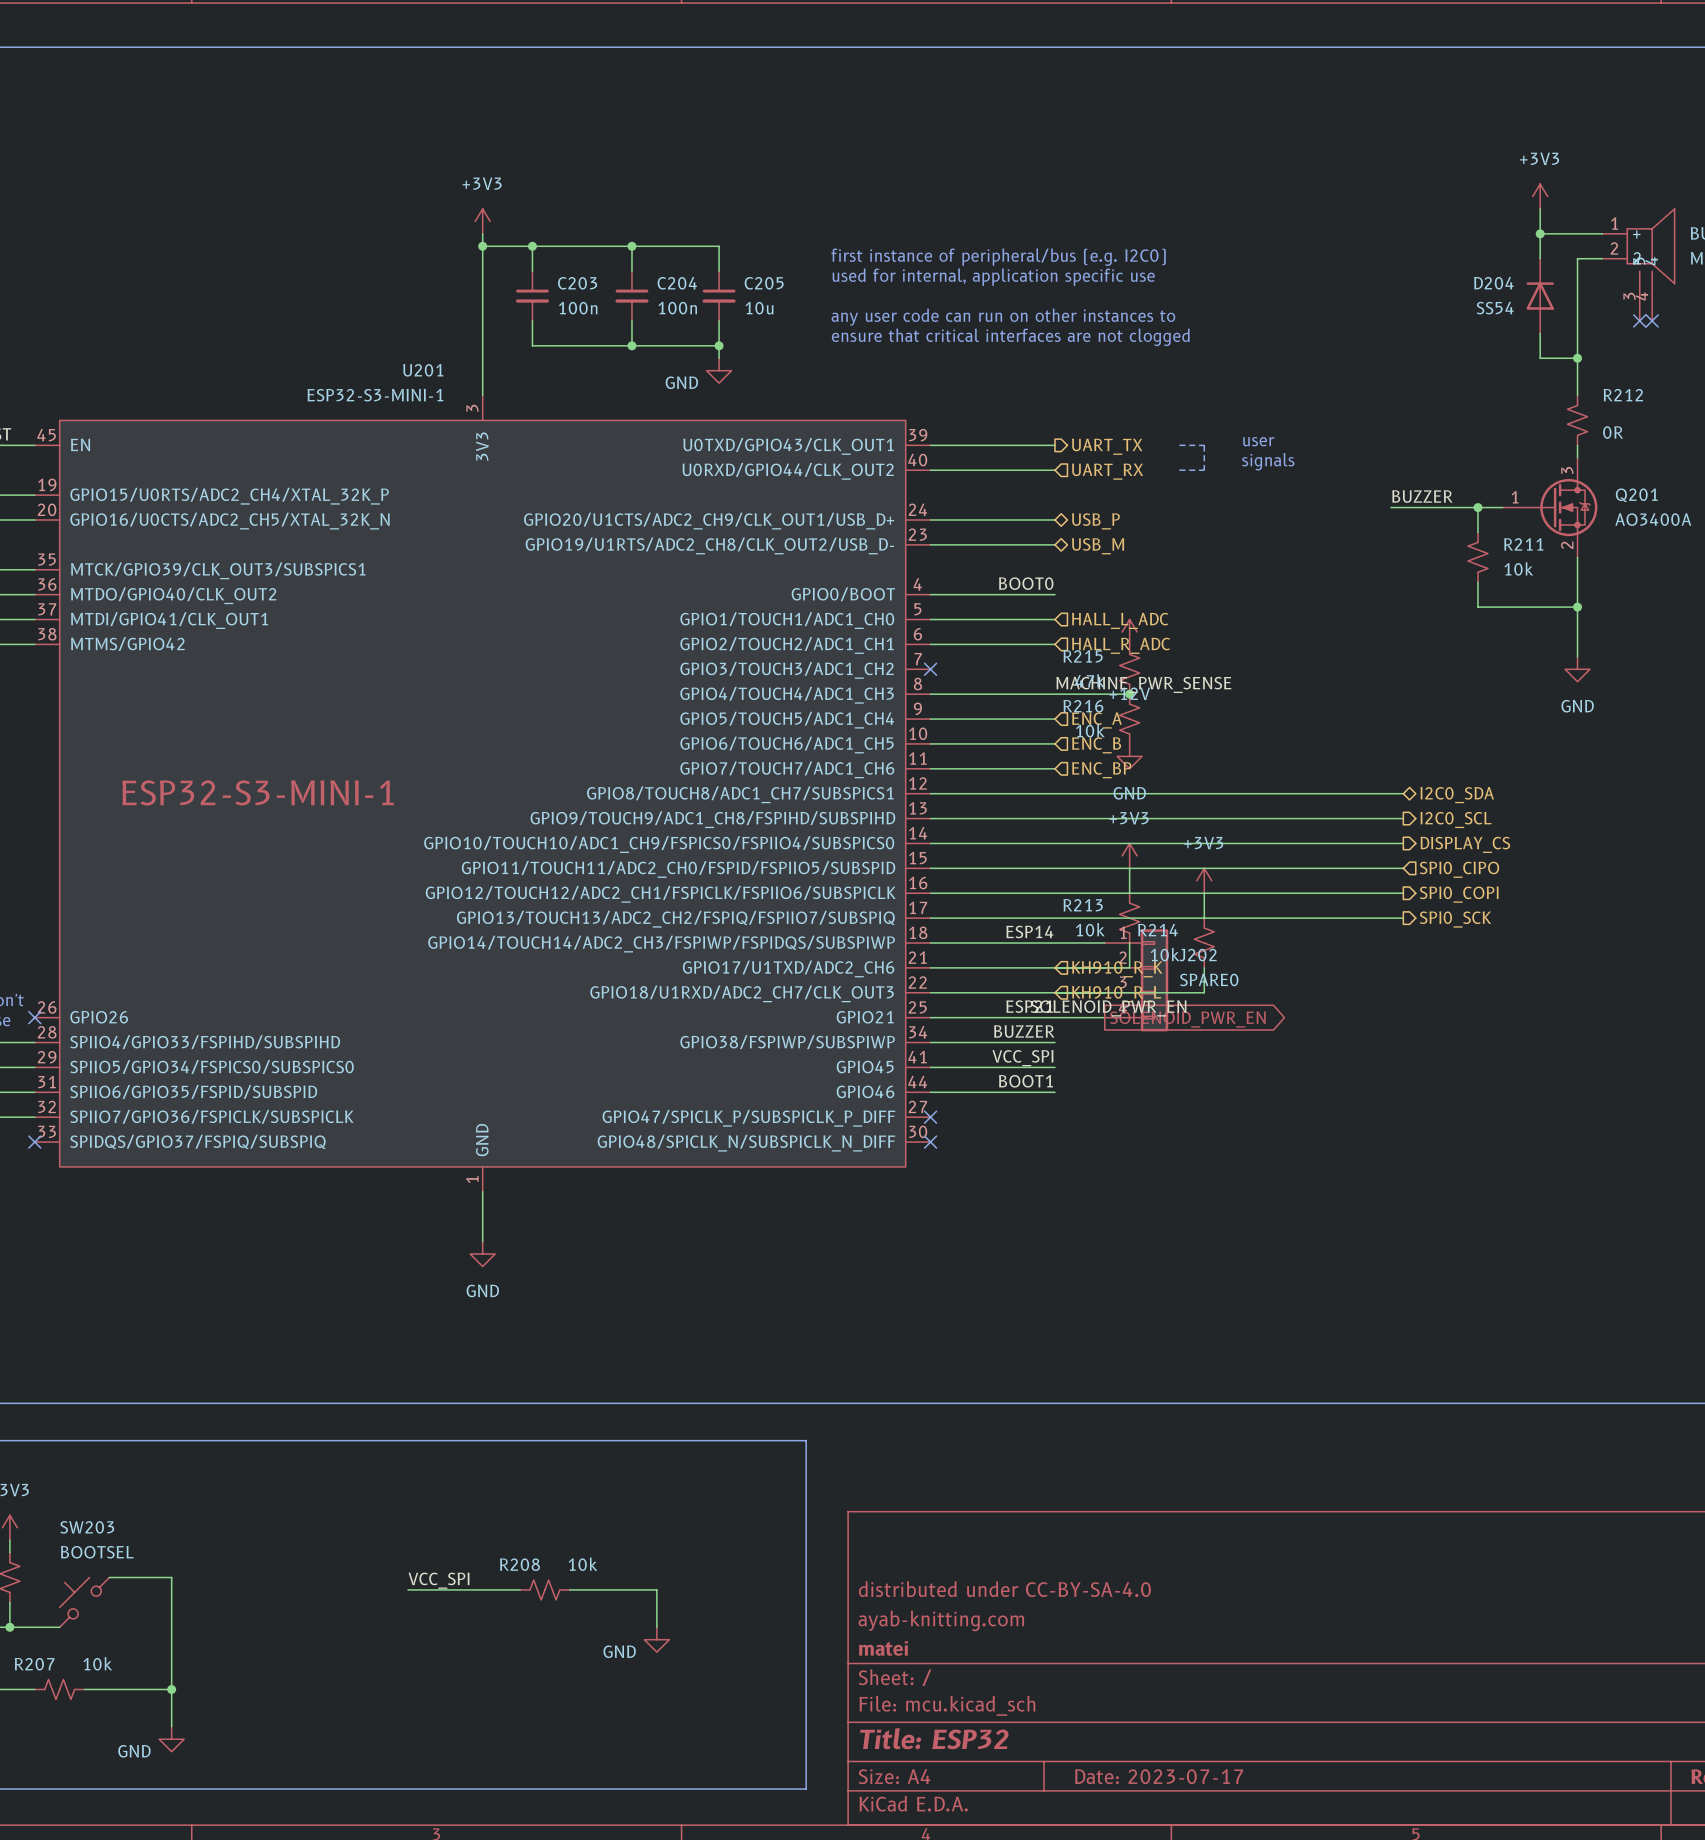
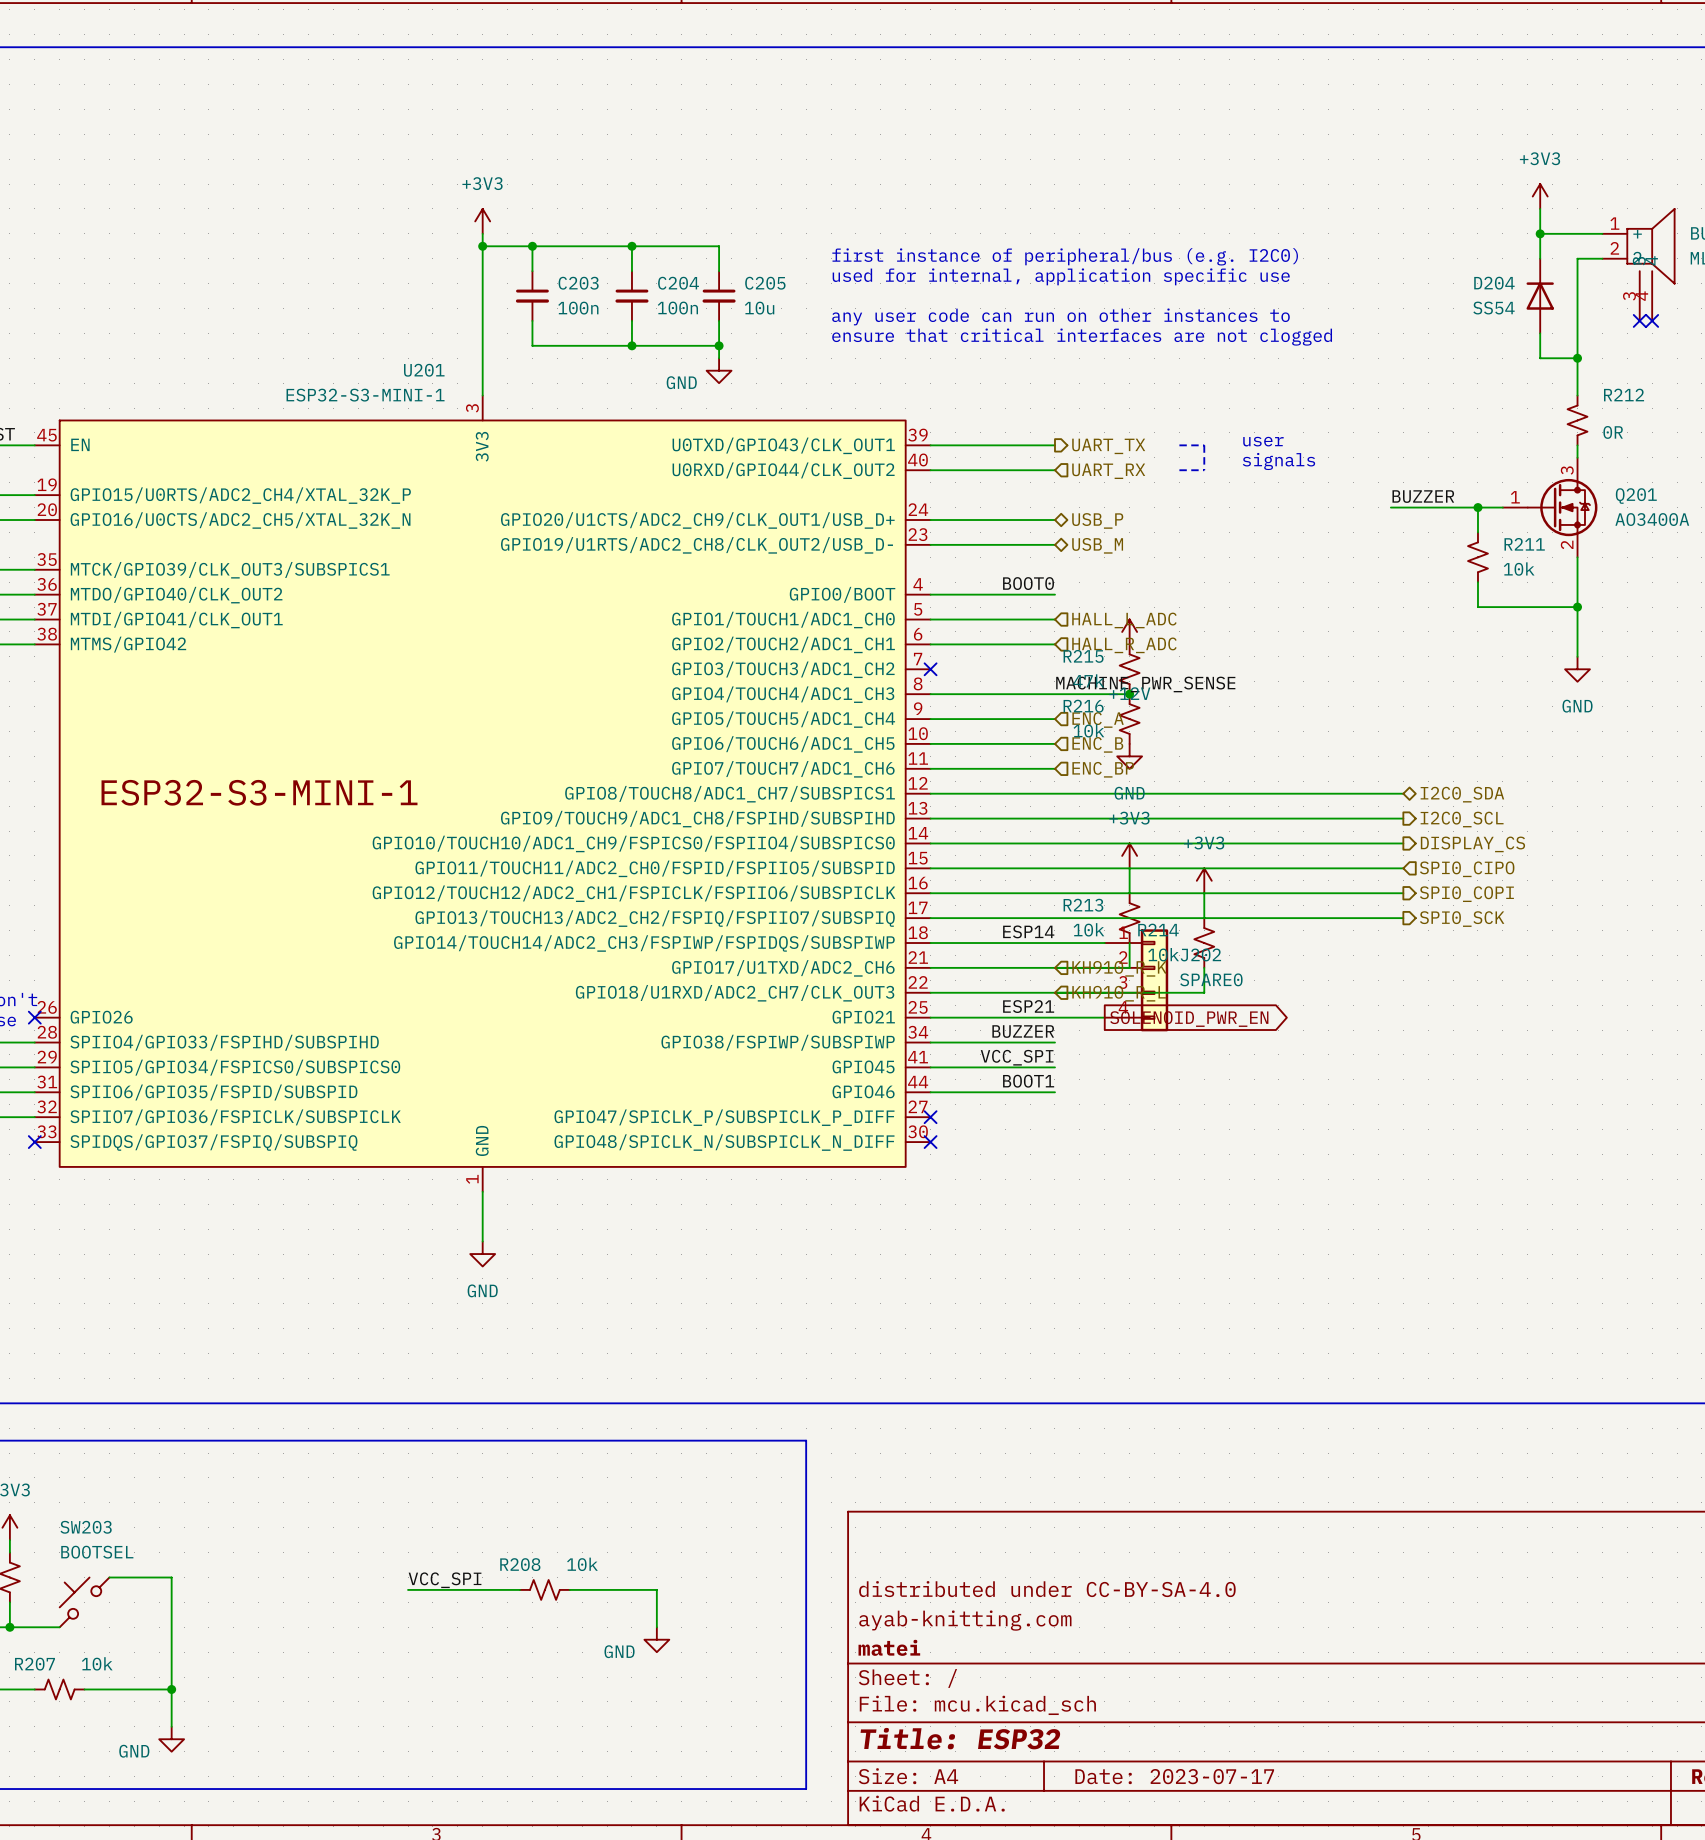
label: SOLENOID_PWR_EN (1108, 1008) -> none

